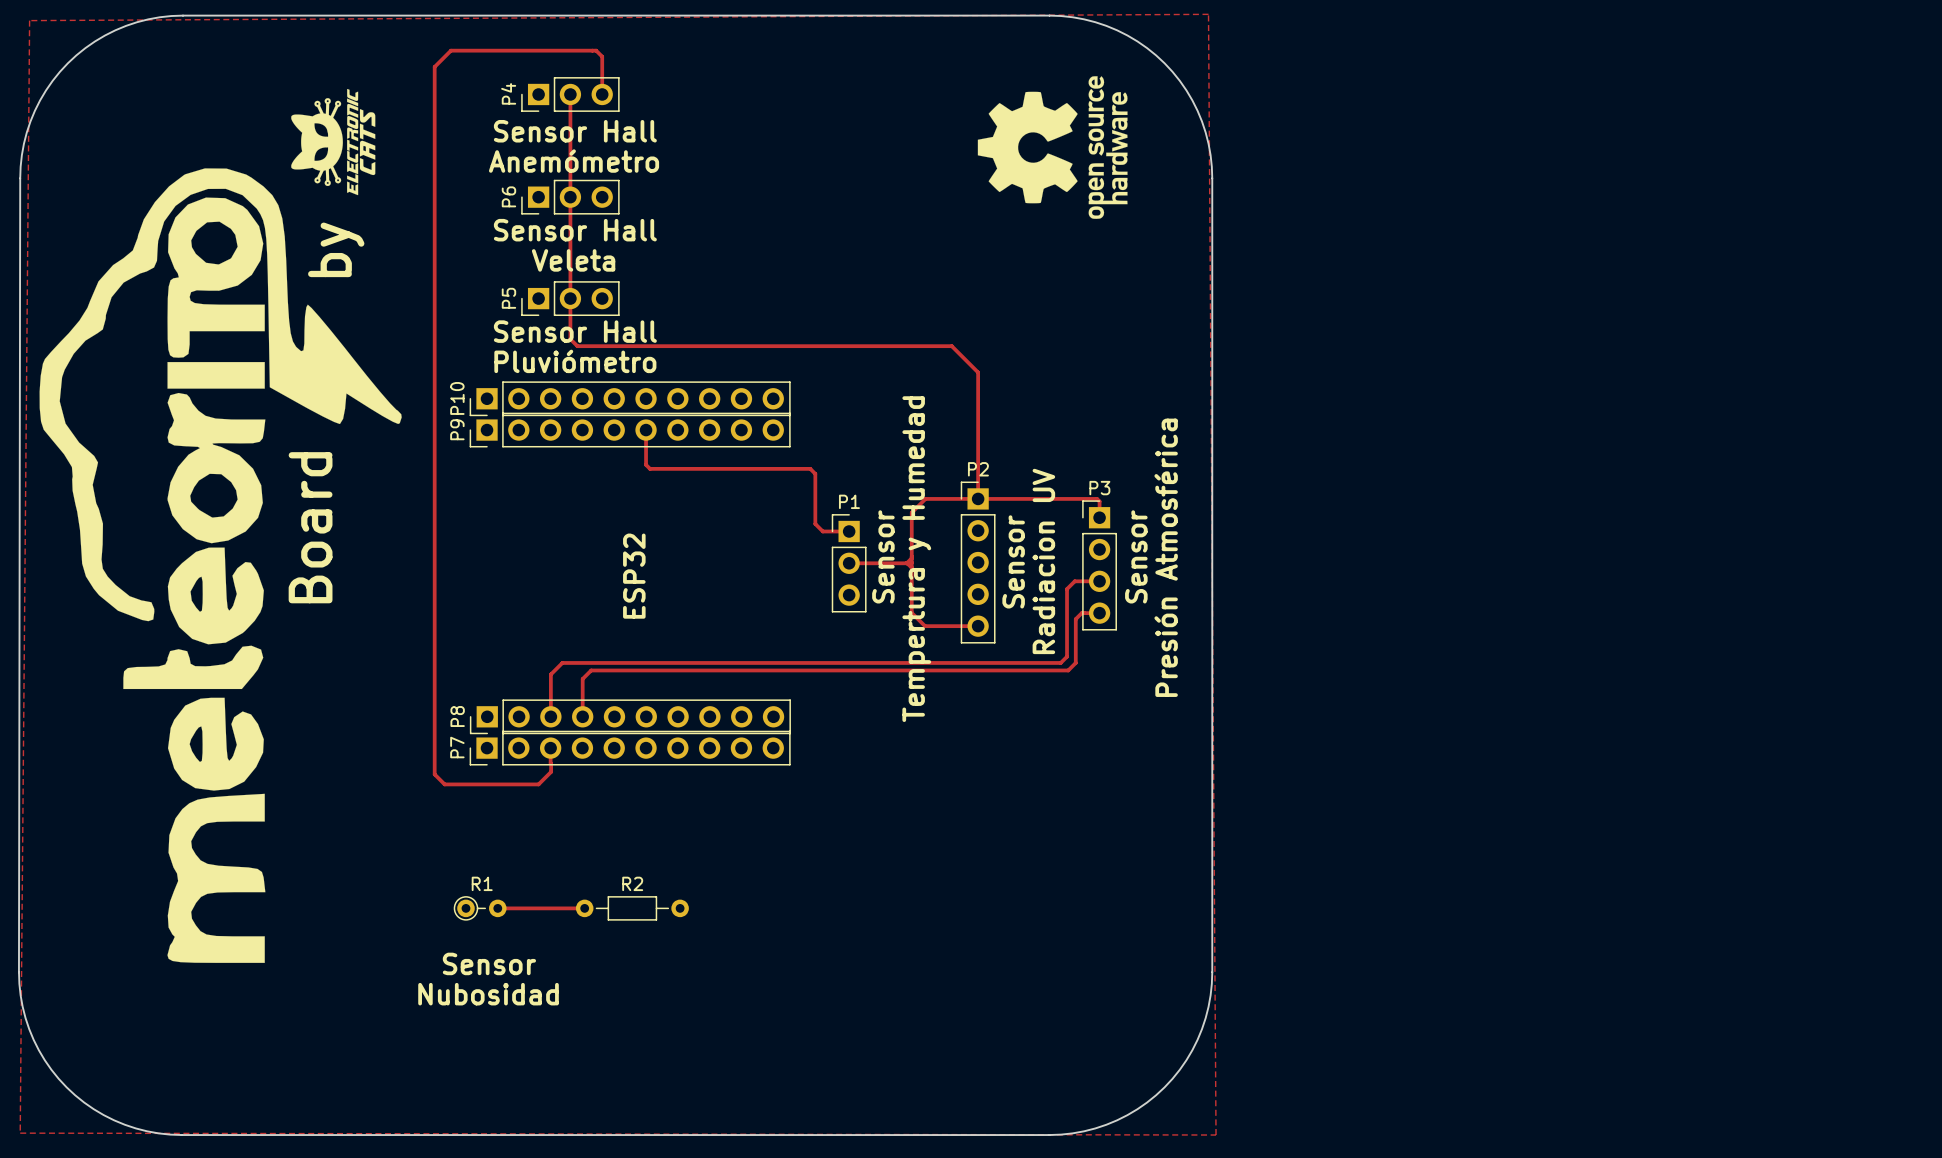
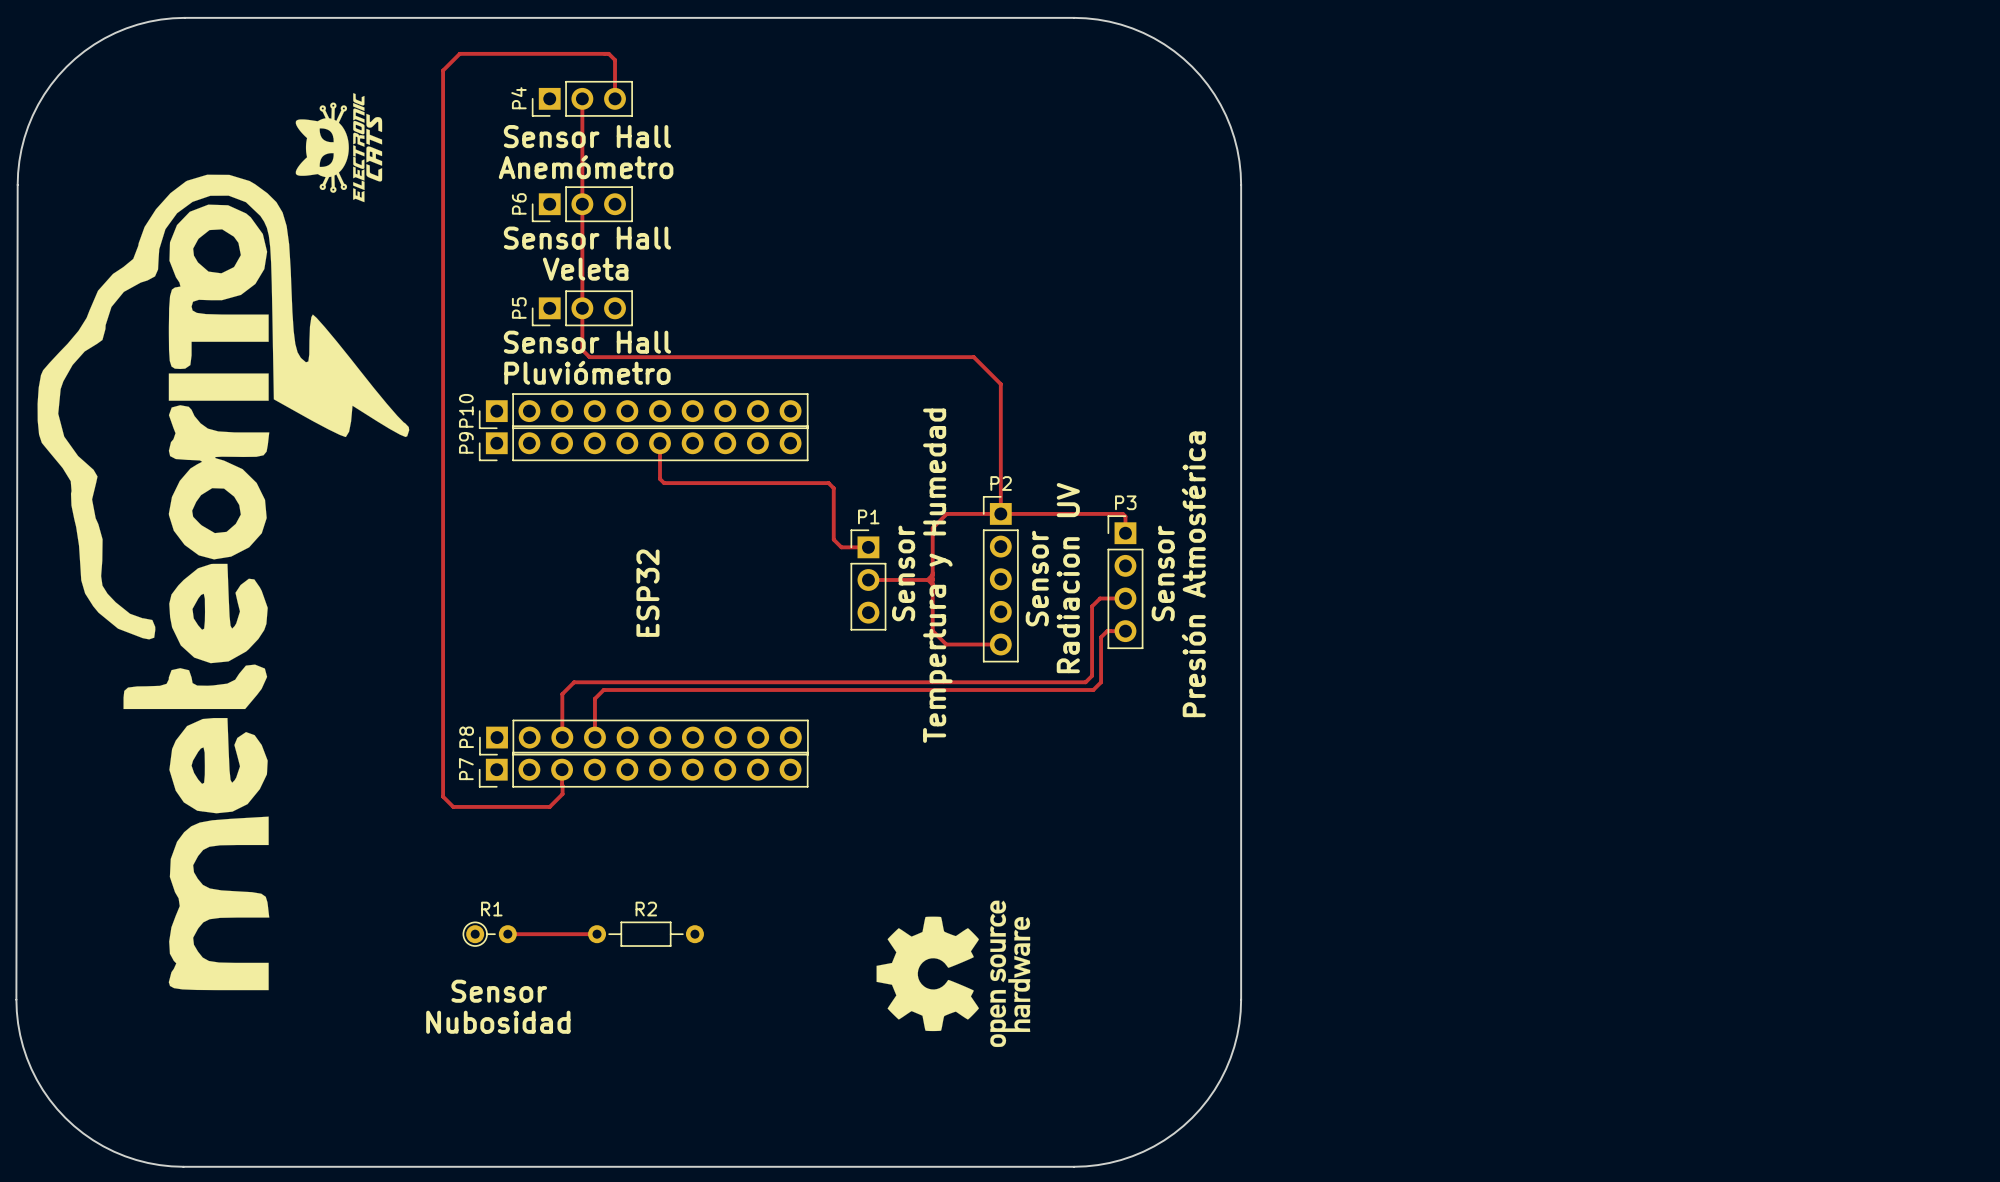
zone outline: (1208, 14) (1216, 1135) (20, 1133) (29, 20) (1208, 14) -> none
drawing: [977, 76, 1128, 219] -> none
text: by (336, 249) -> none
text: Board (310, 527) -> none
drawing: none -> [876, 900, 1031, 1048]

